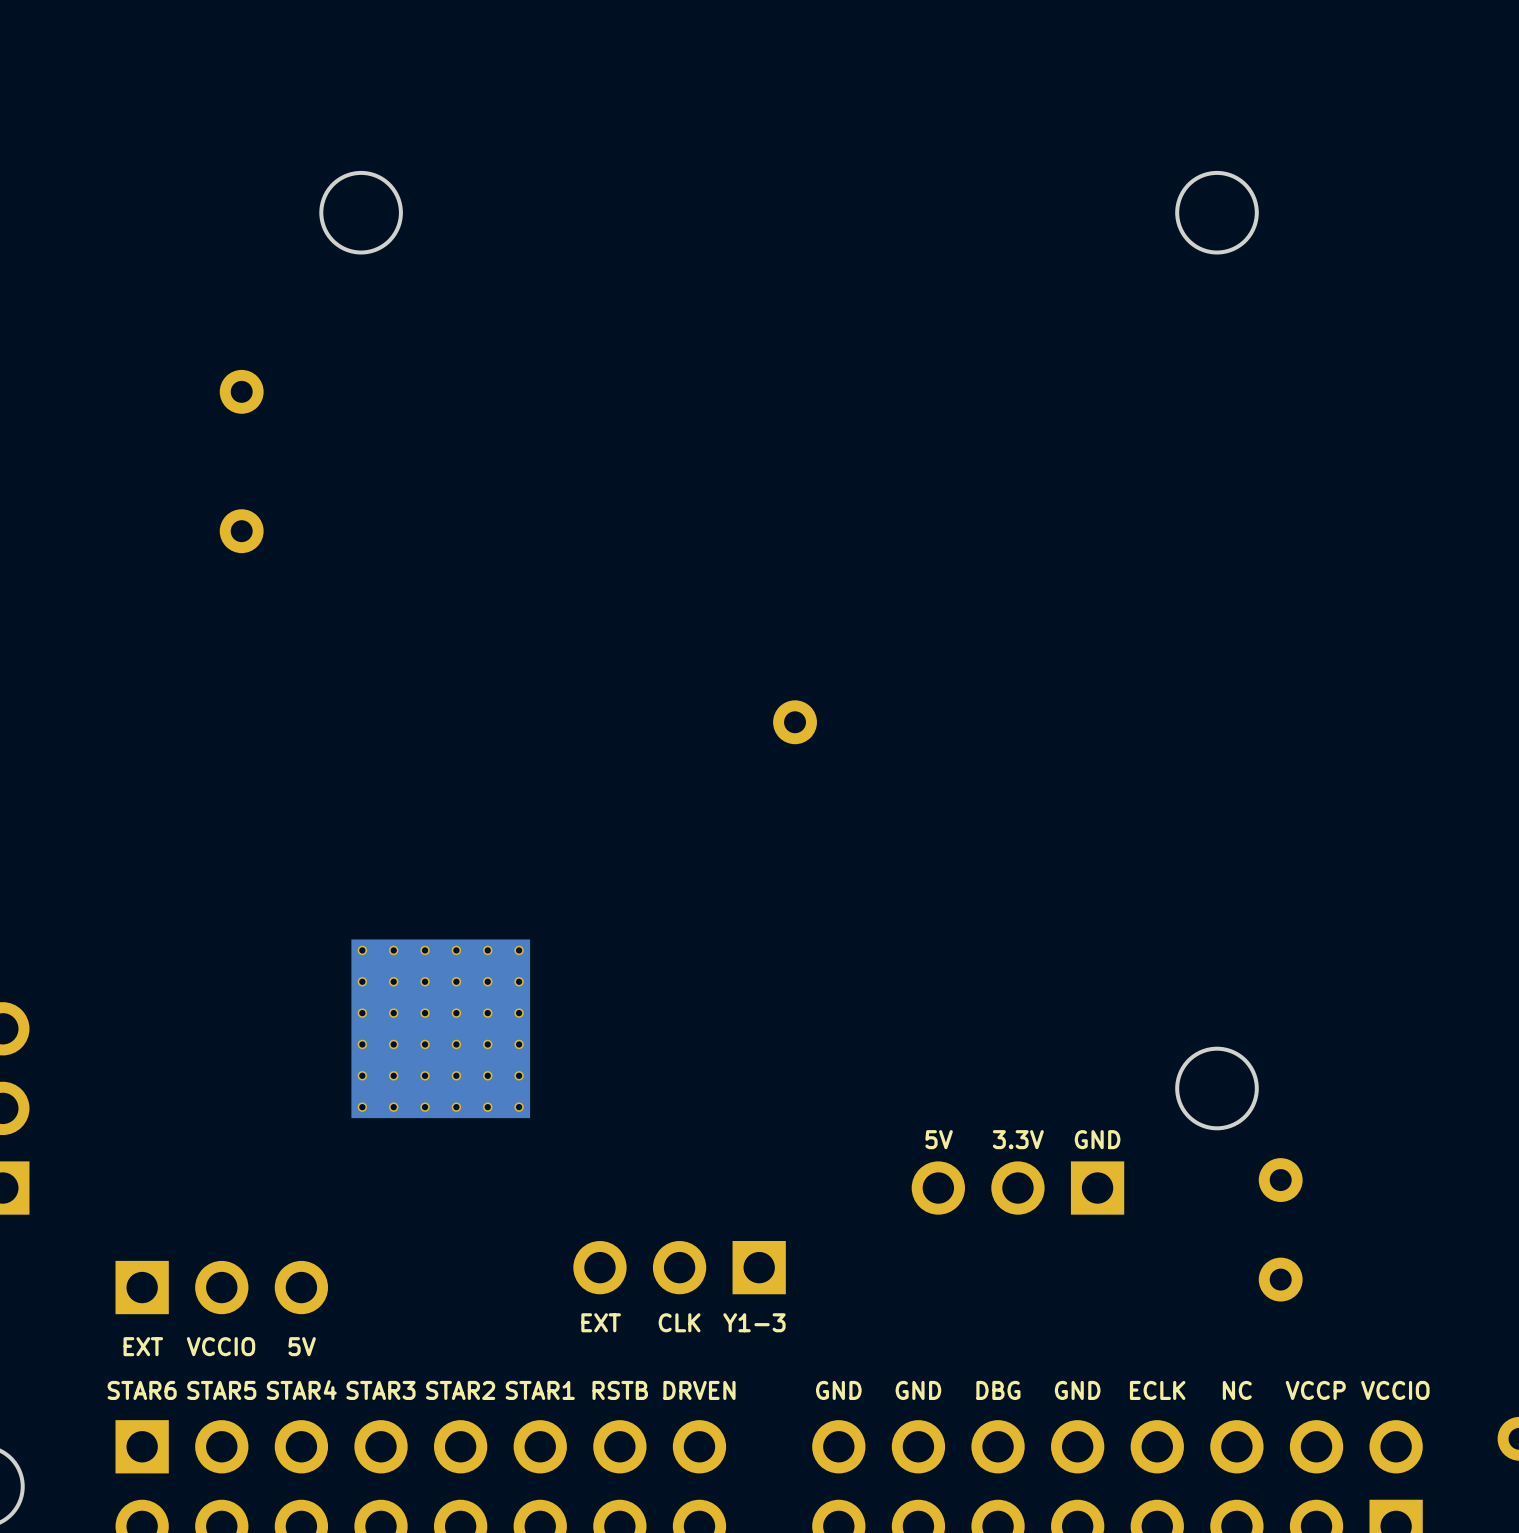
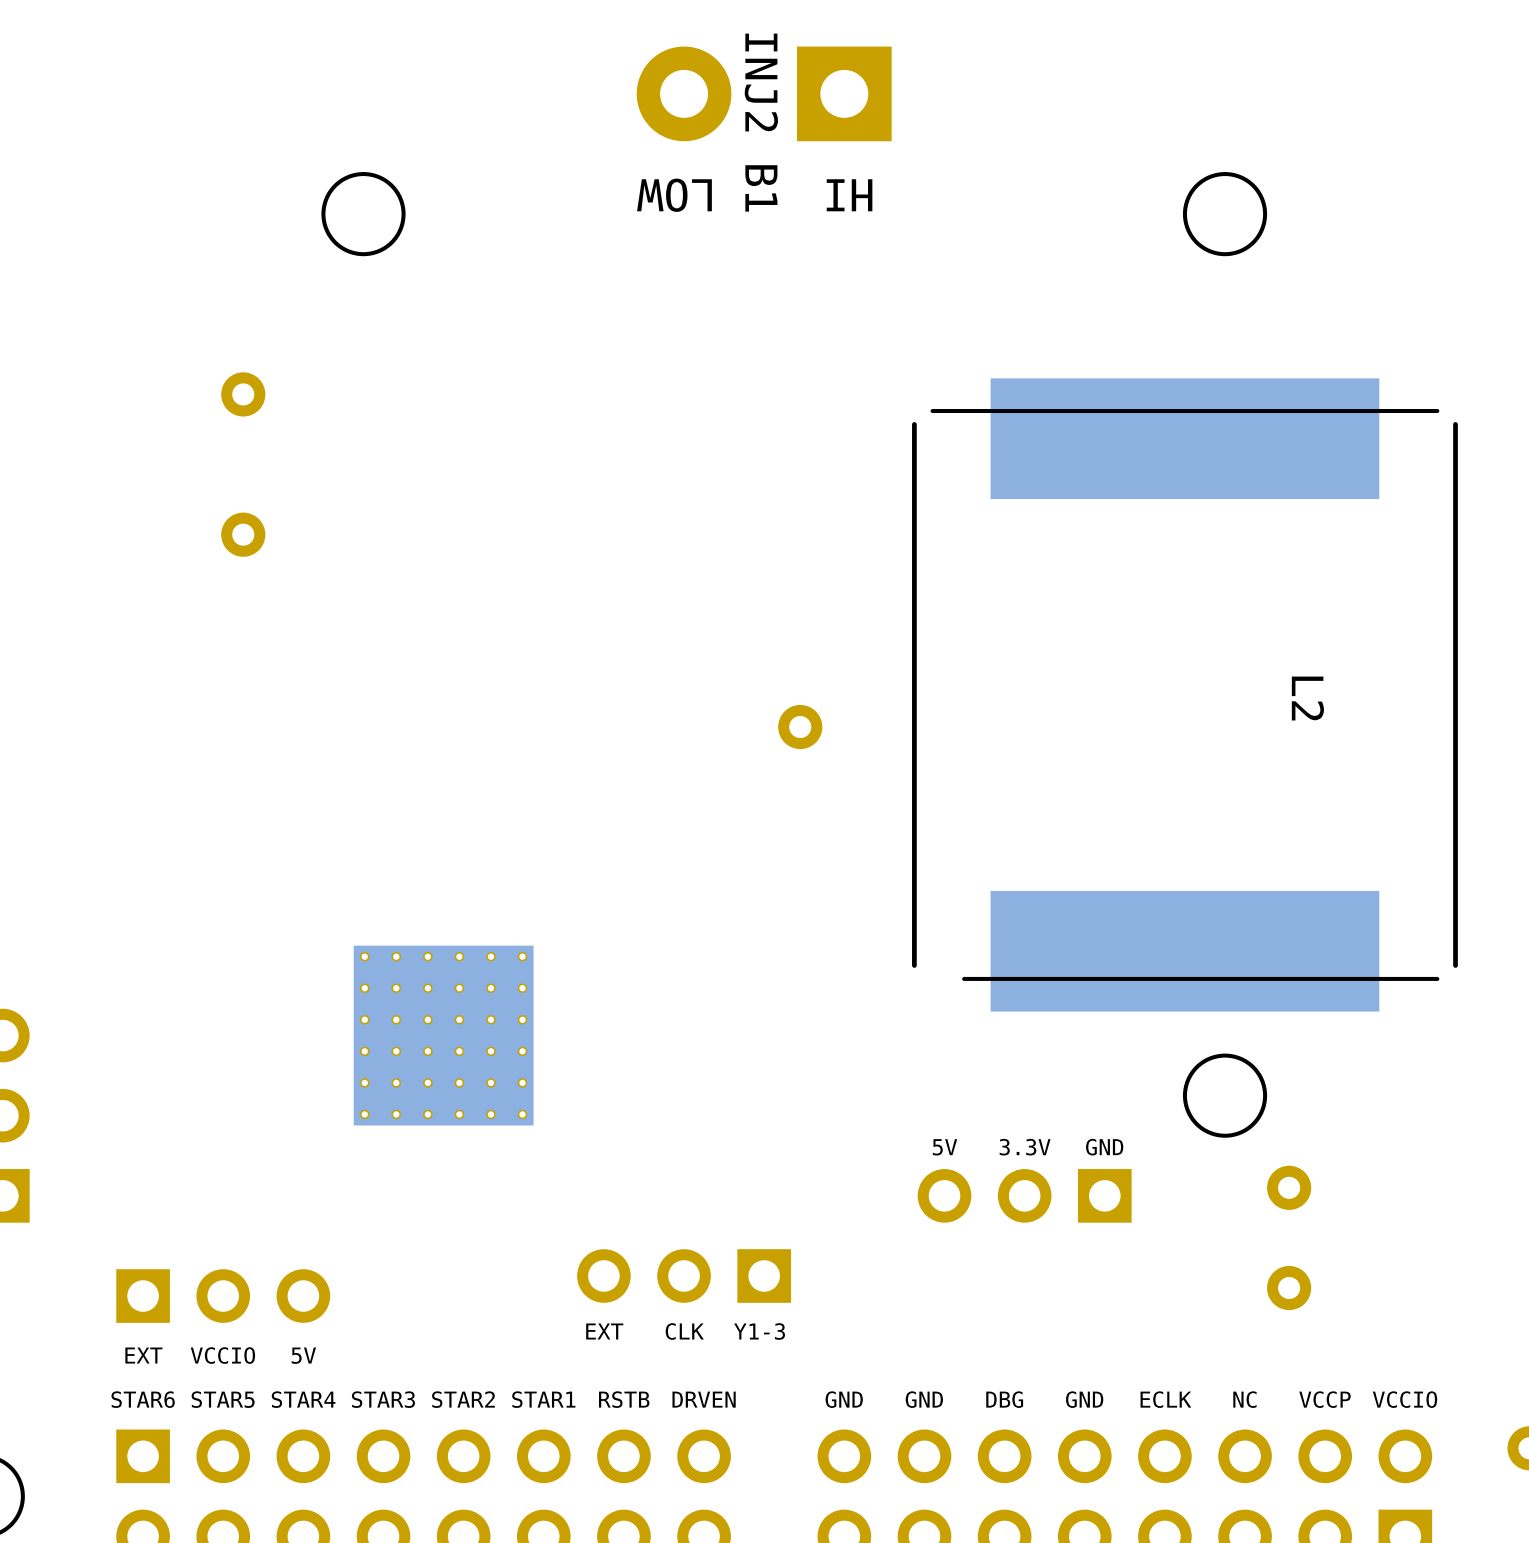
part: none -> (764, 93)
text: none -> INJ2 B1 (761, 122)
text: none -> HI LOW (754, 195)
L2: none -> (1184, 694)

